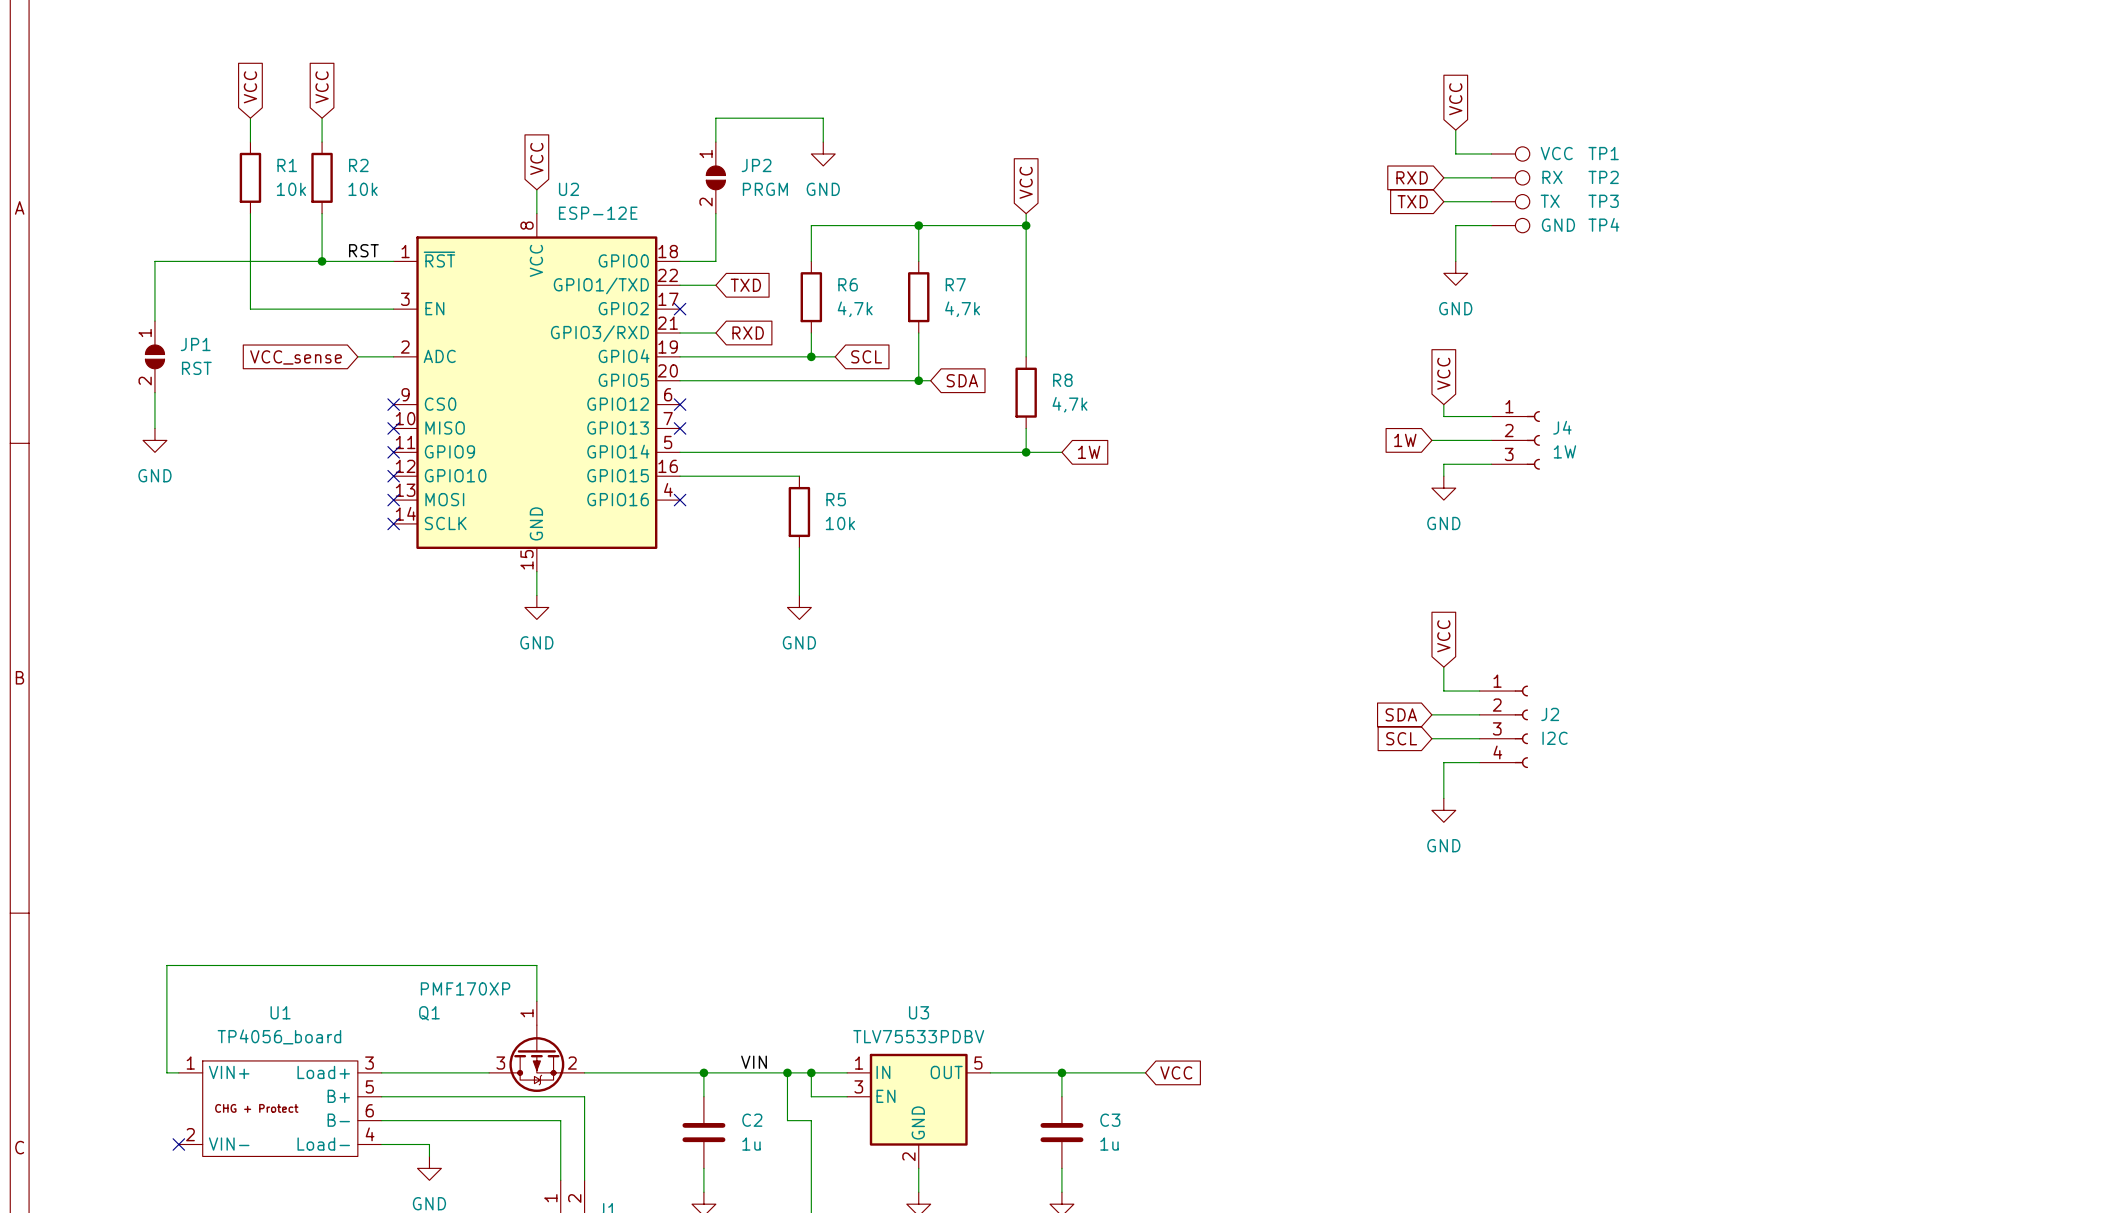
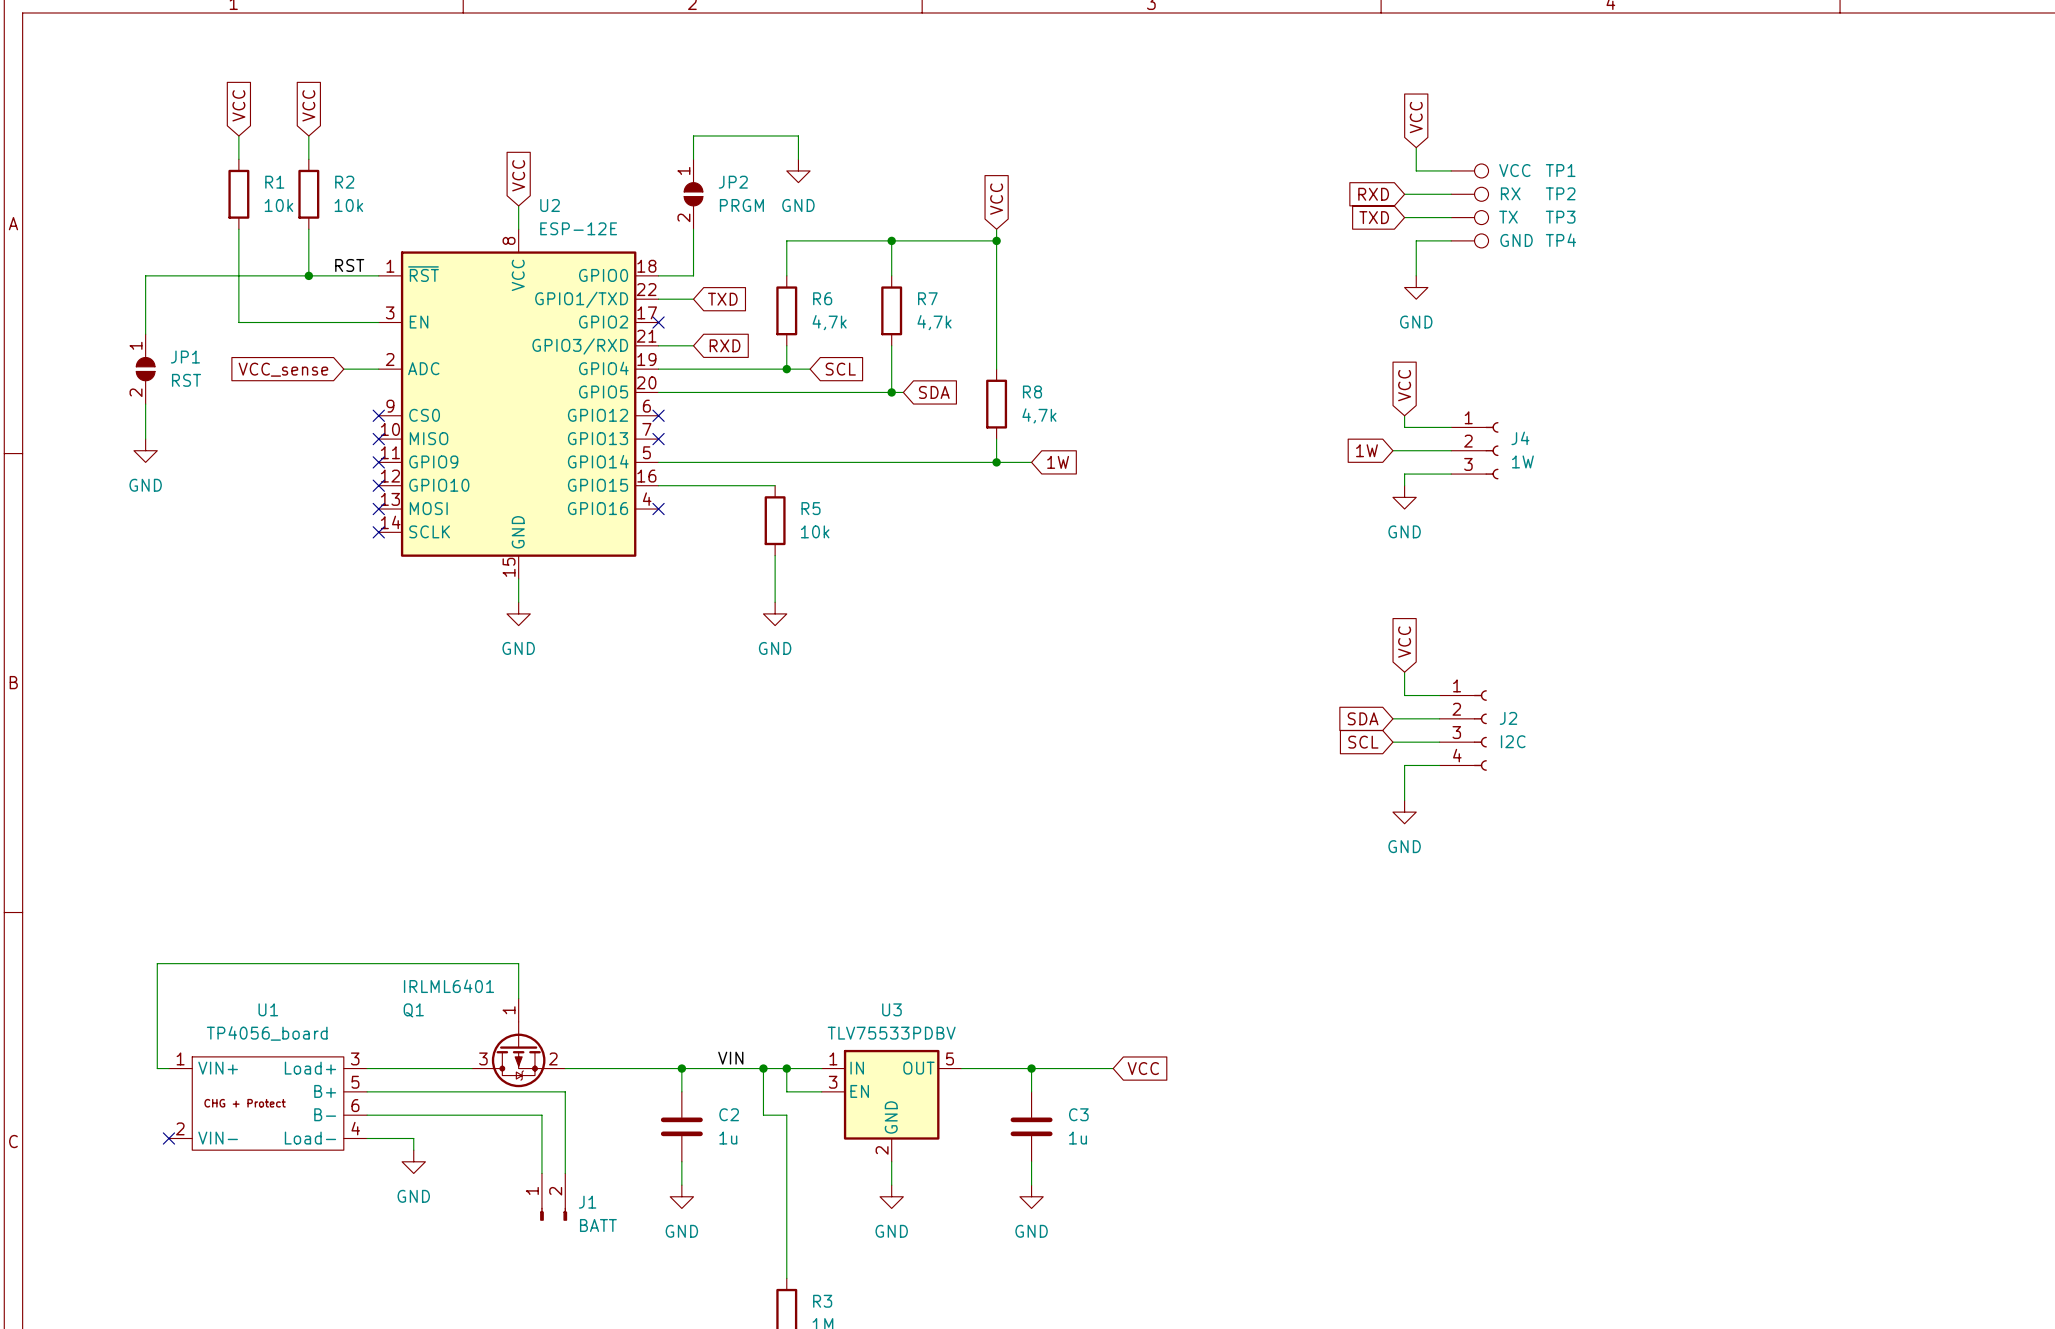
Q1 value: PMF170XP (465, 988) -> IRLML6401 (448, 986)

